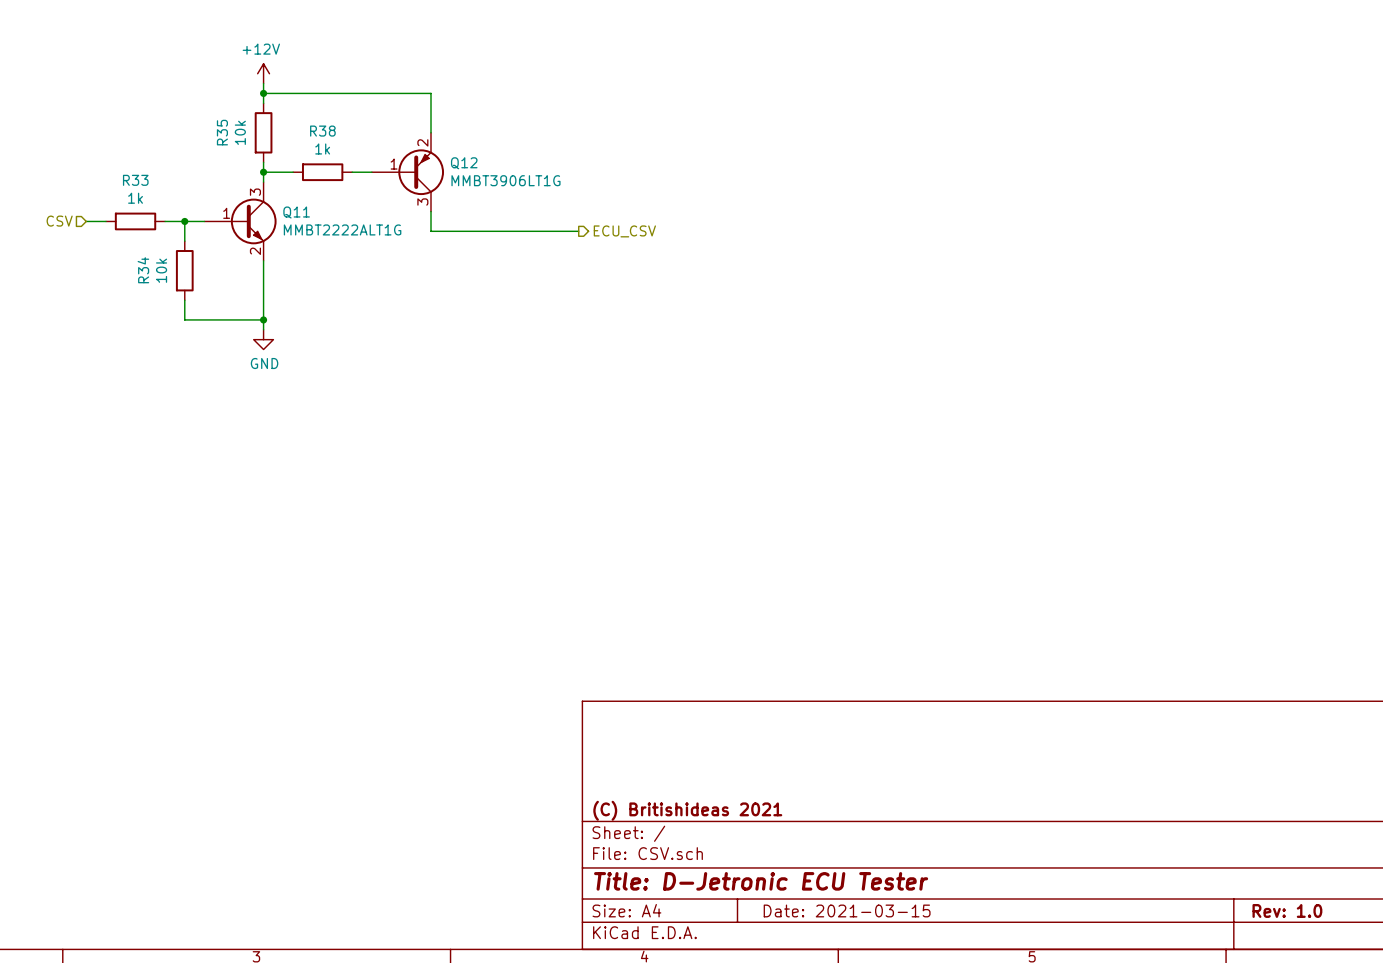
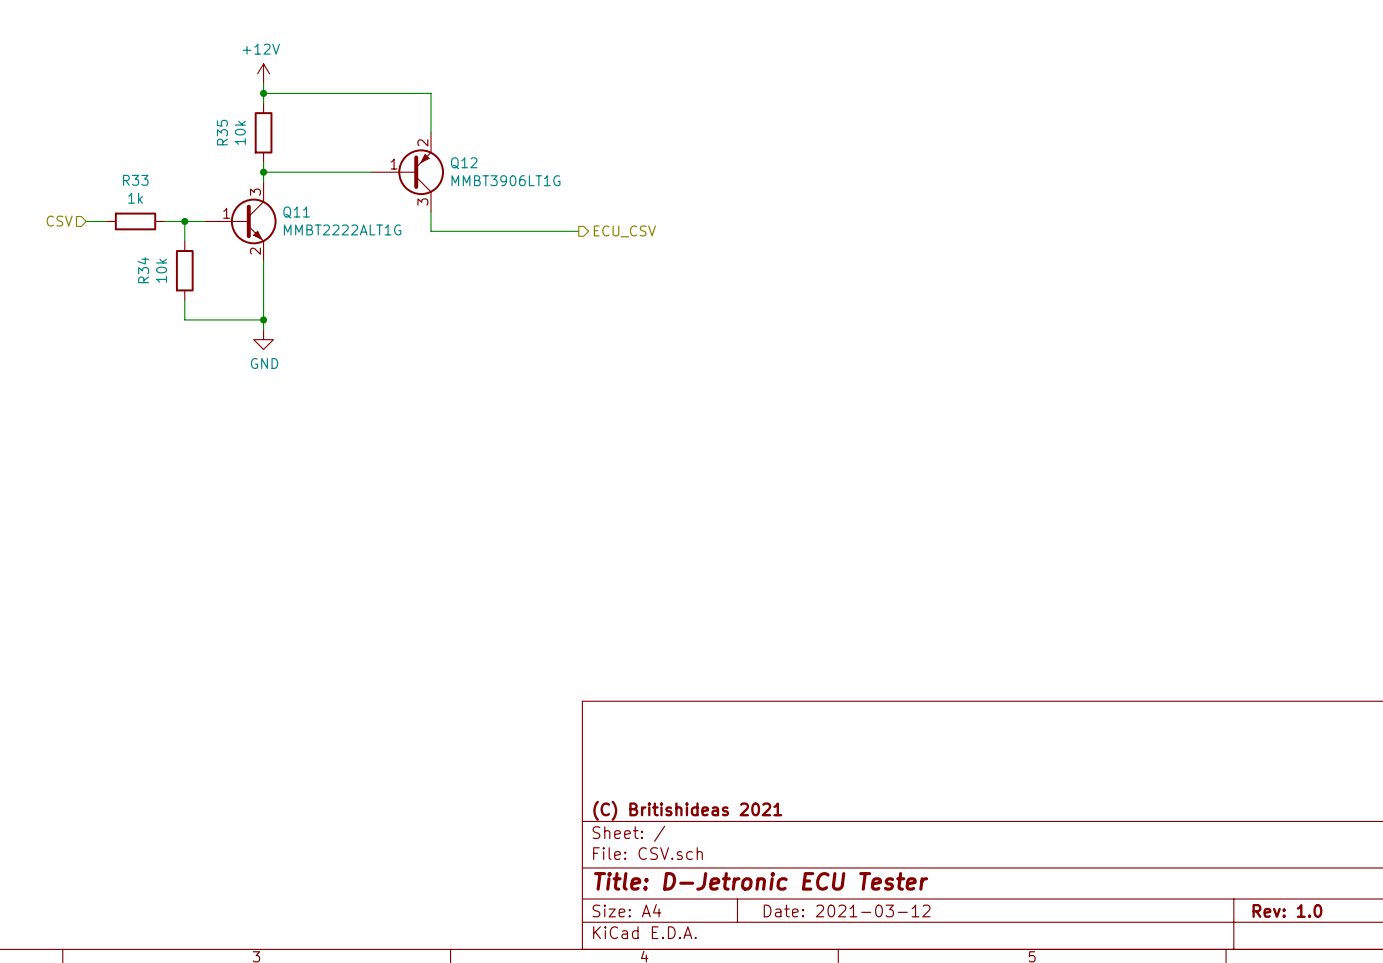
wire: none -> (293, 172) (352, 172)
R38: 1k (322, 172) -> none
title block: Date: 2021-03-15 (847, 910) -> Date: 2021-03-12 (847, 910)

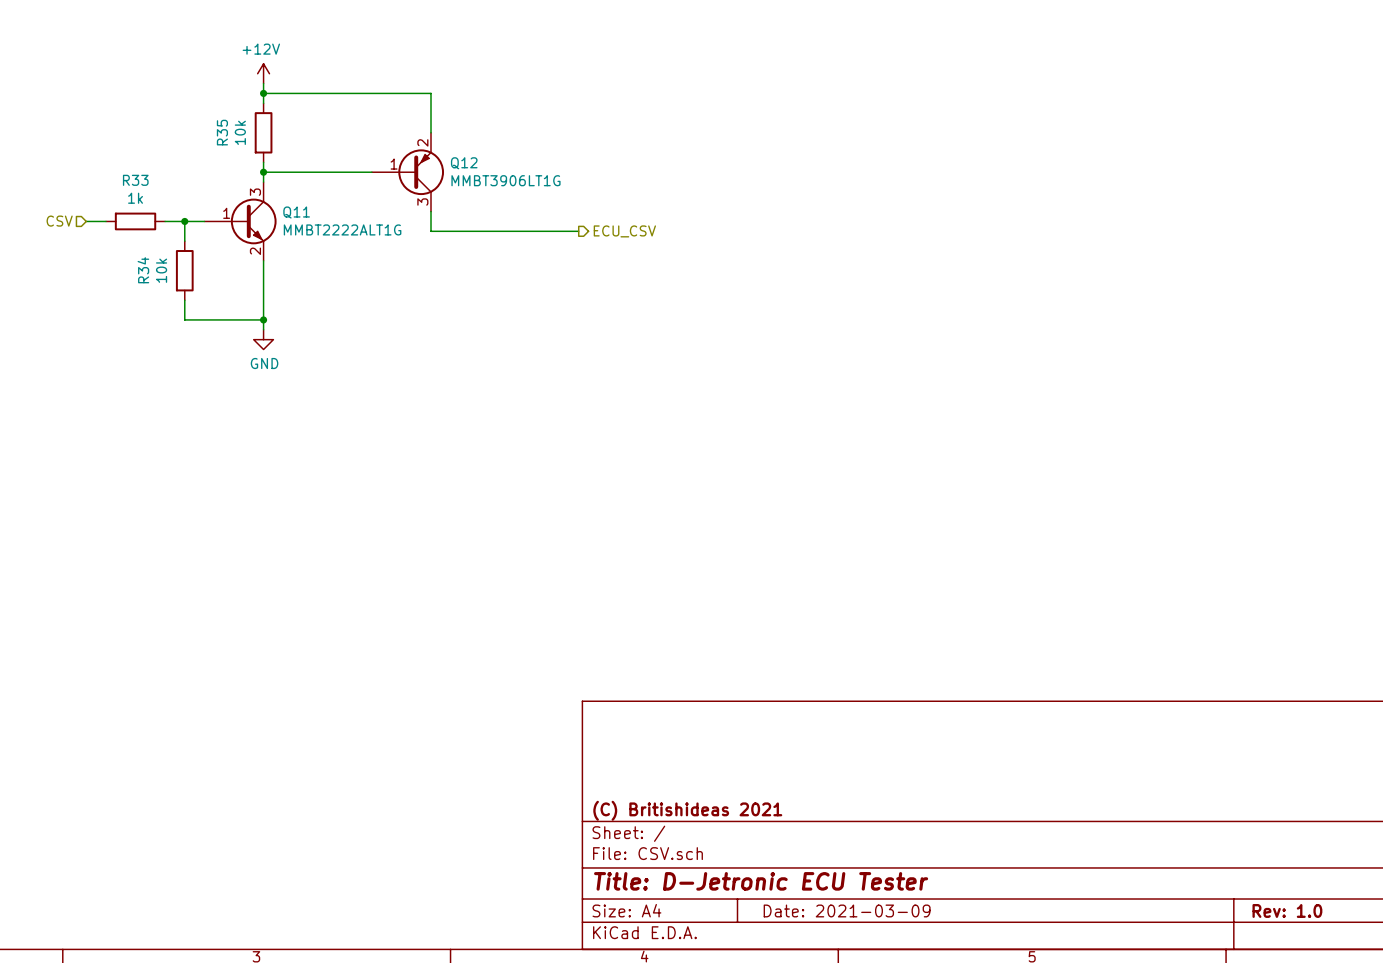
title block: Date: 2021-03-12 (847, 910) -> Date: 2021-03-09 (847, 910)

